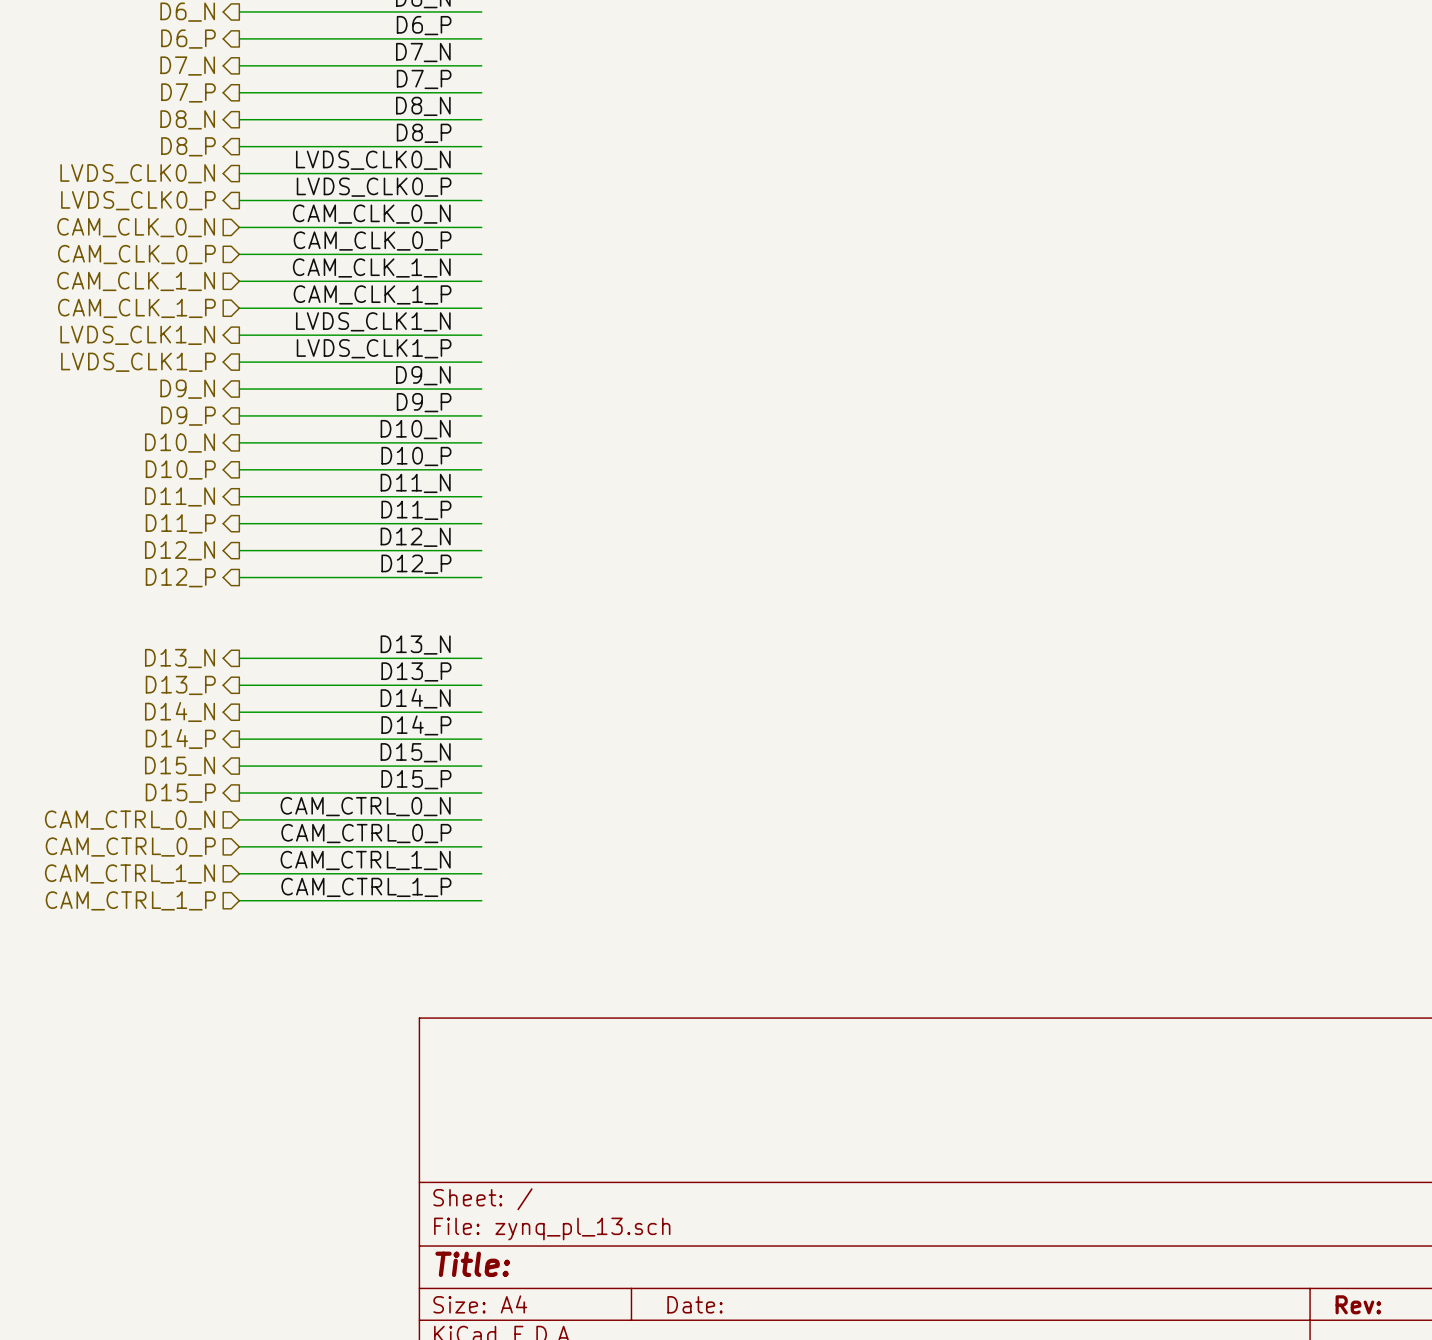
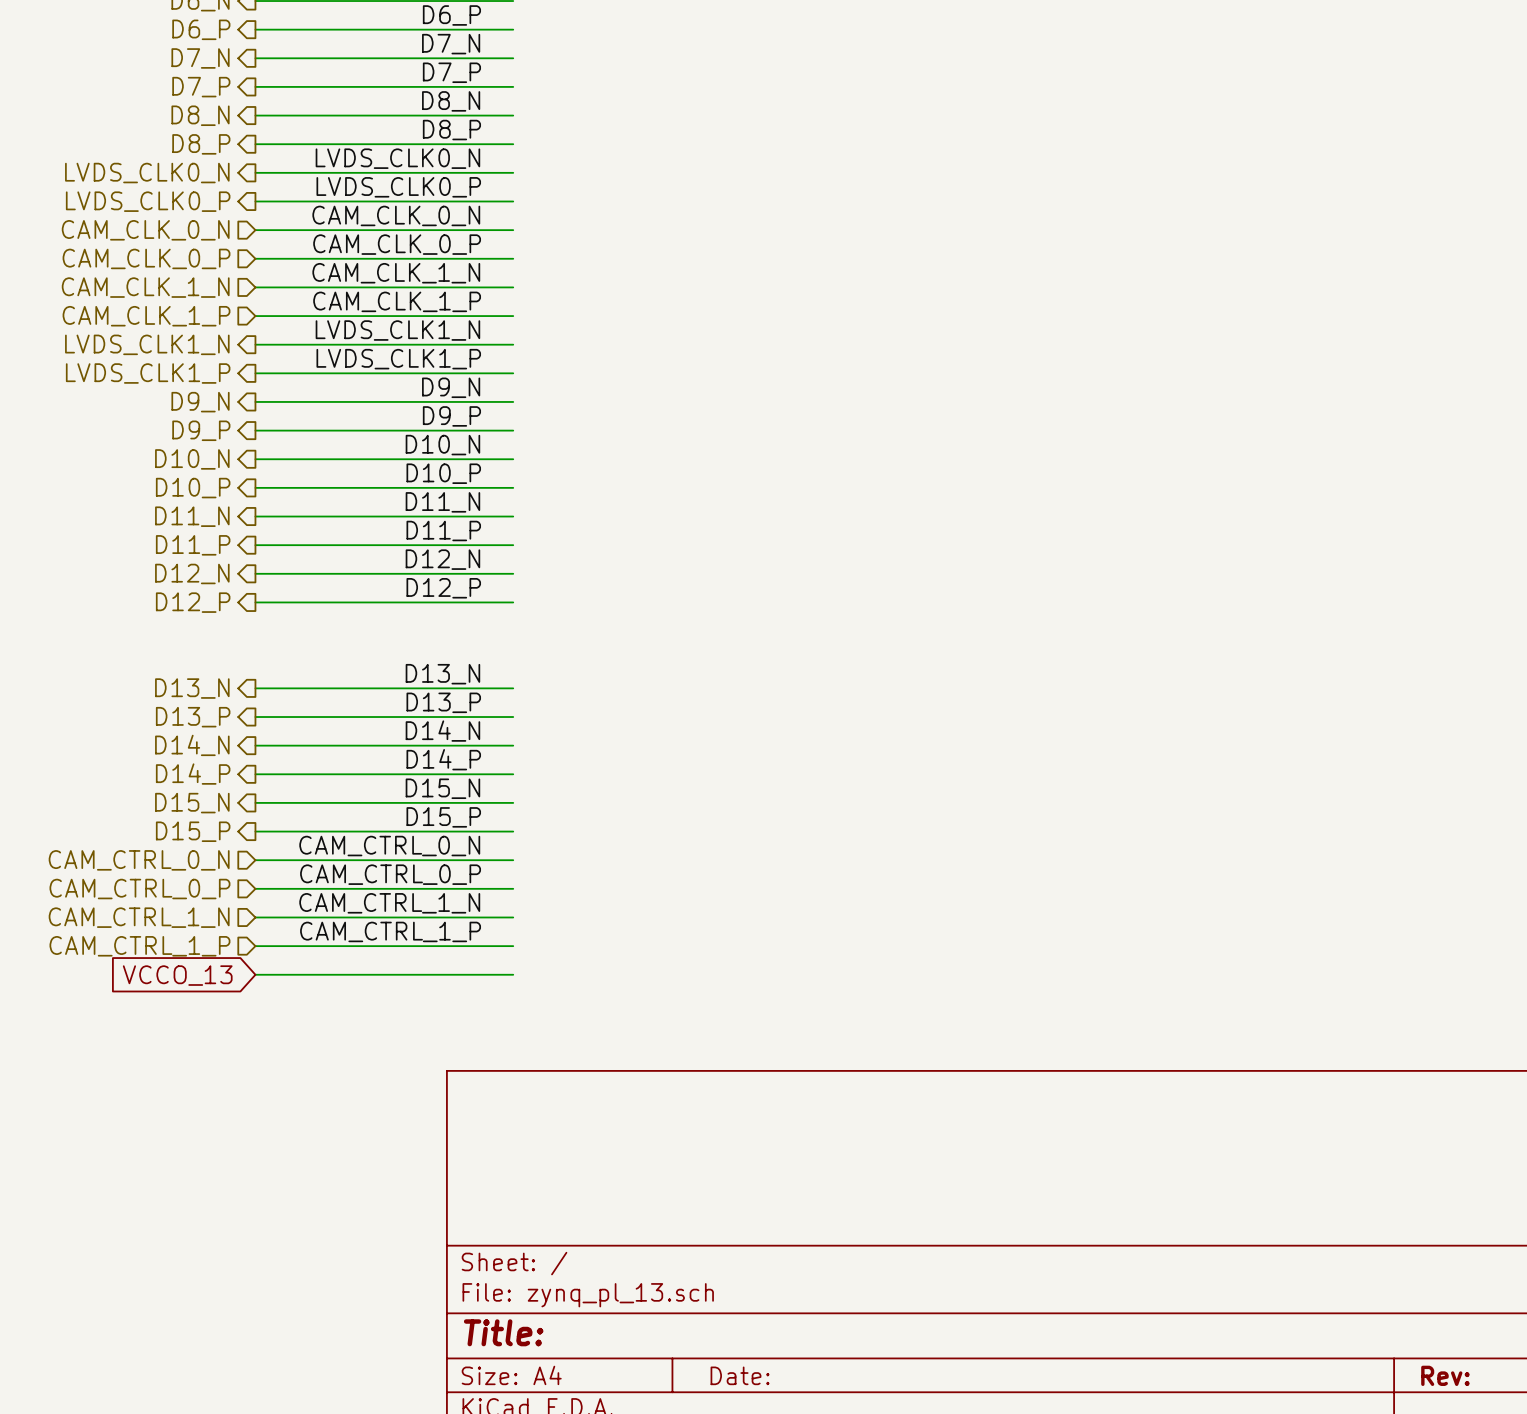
wire: none -> (255, 974) (513, 974)
global label: none -> VCCO_13 (177, 975)

